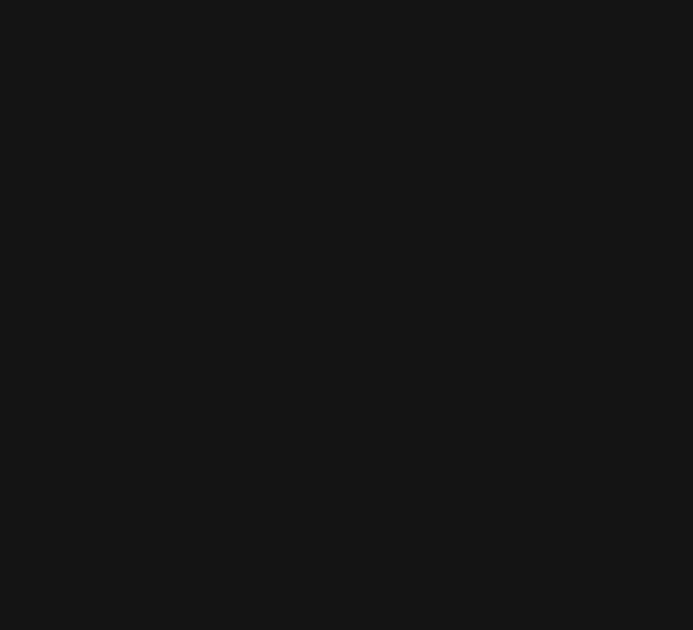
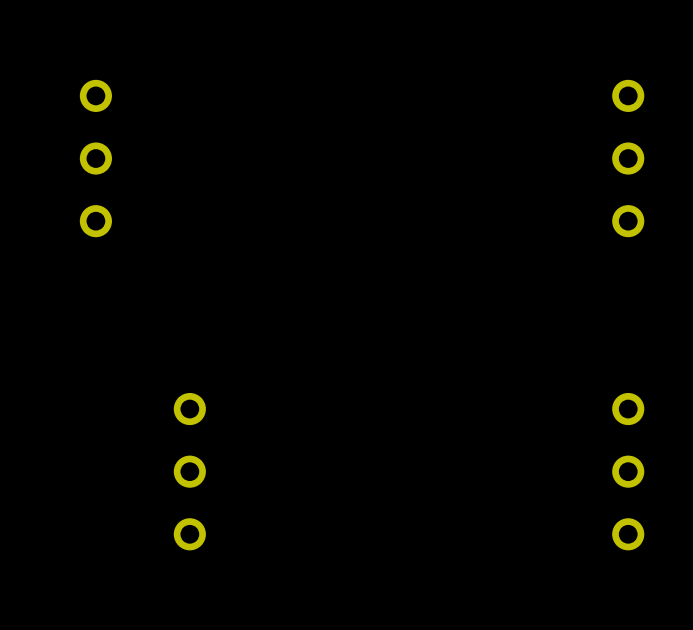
part: none -> (95, 158)
part: none -> (628, 158)
part: none -> (189, 471)
part: none -> (628, 471)

